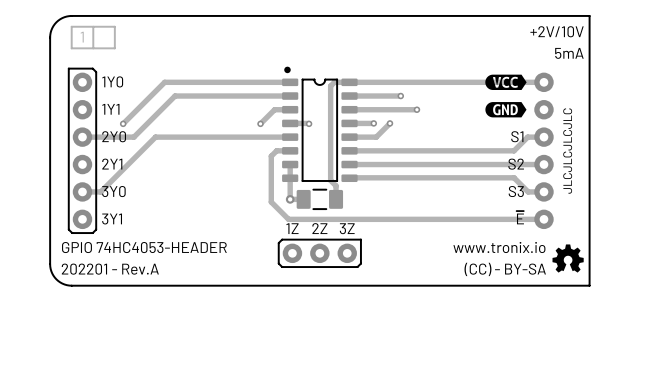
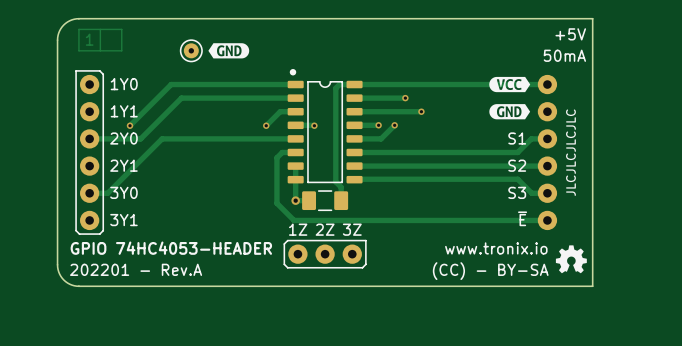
text: +2V/10V (557, 31) -> +5V (570, 34)
drawing: none -> [208, 43, 250, 59]
part: none -> (191, 50)
text: 5mA (569, 53) -> 50mA (564, 55)

